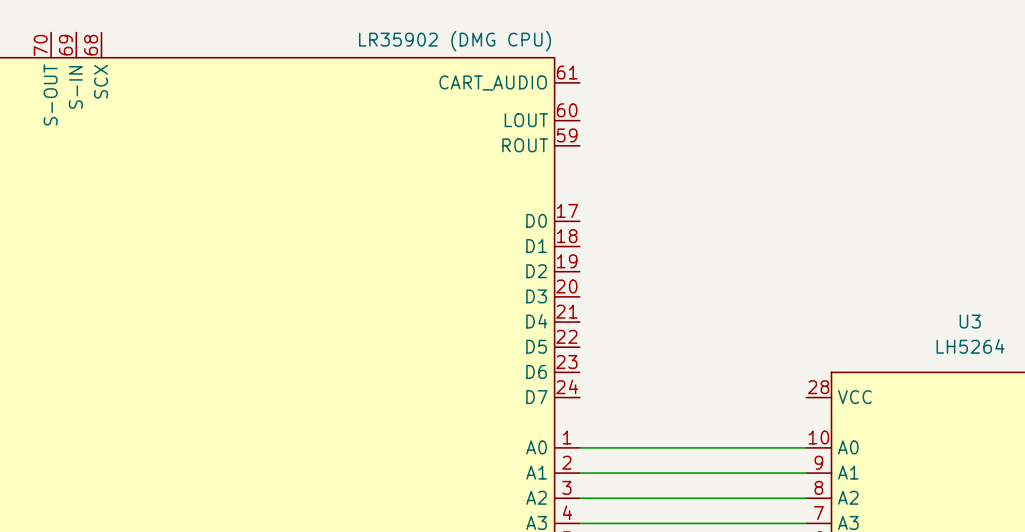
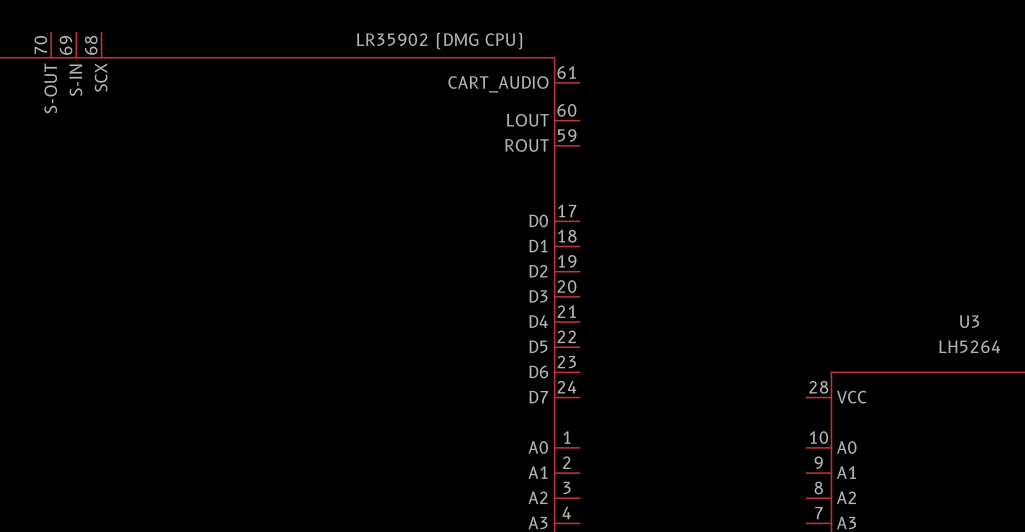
wire: (579, 447) (806, 447) -> none
wire: (579, 473) (806, 473) -> none
wire: (579, 498) (806, 498) -> none
wire: (579, 523) (806, 523) -> none

